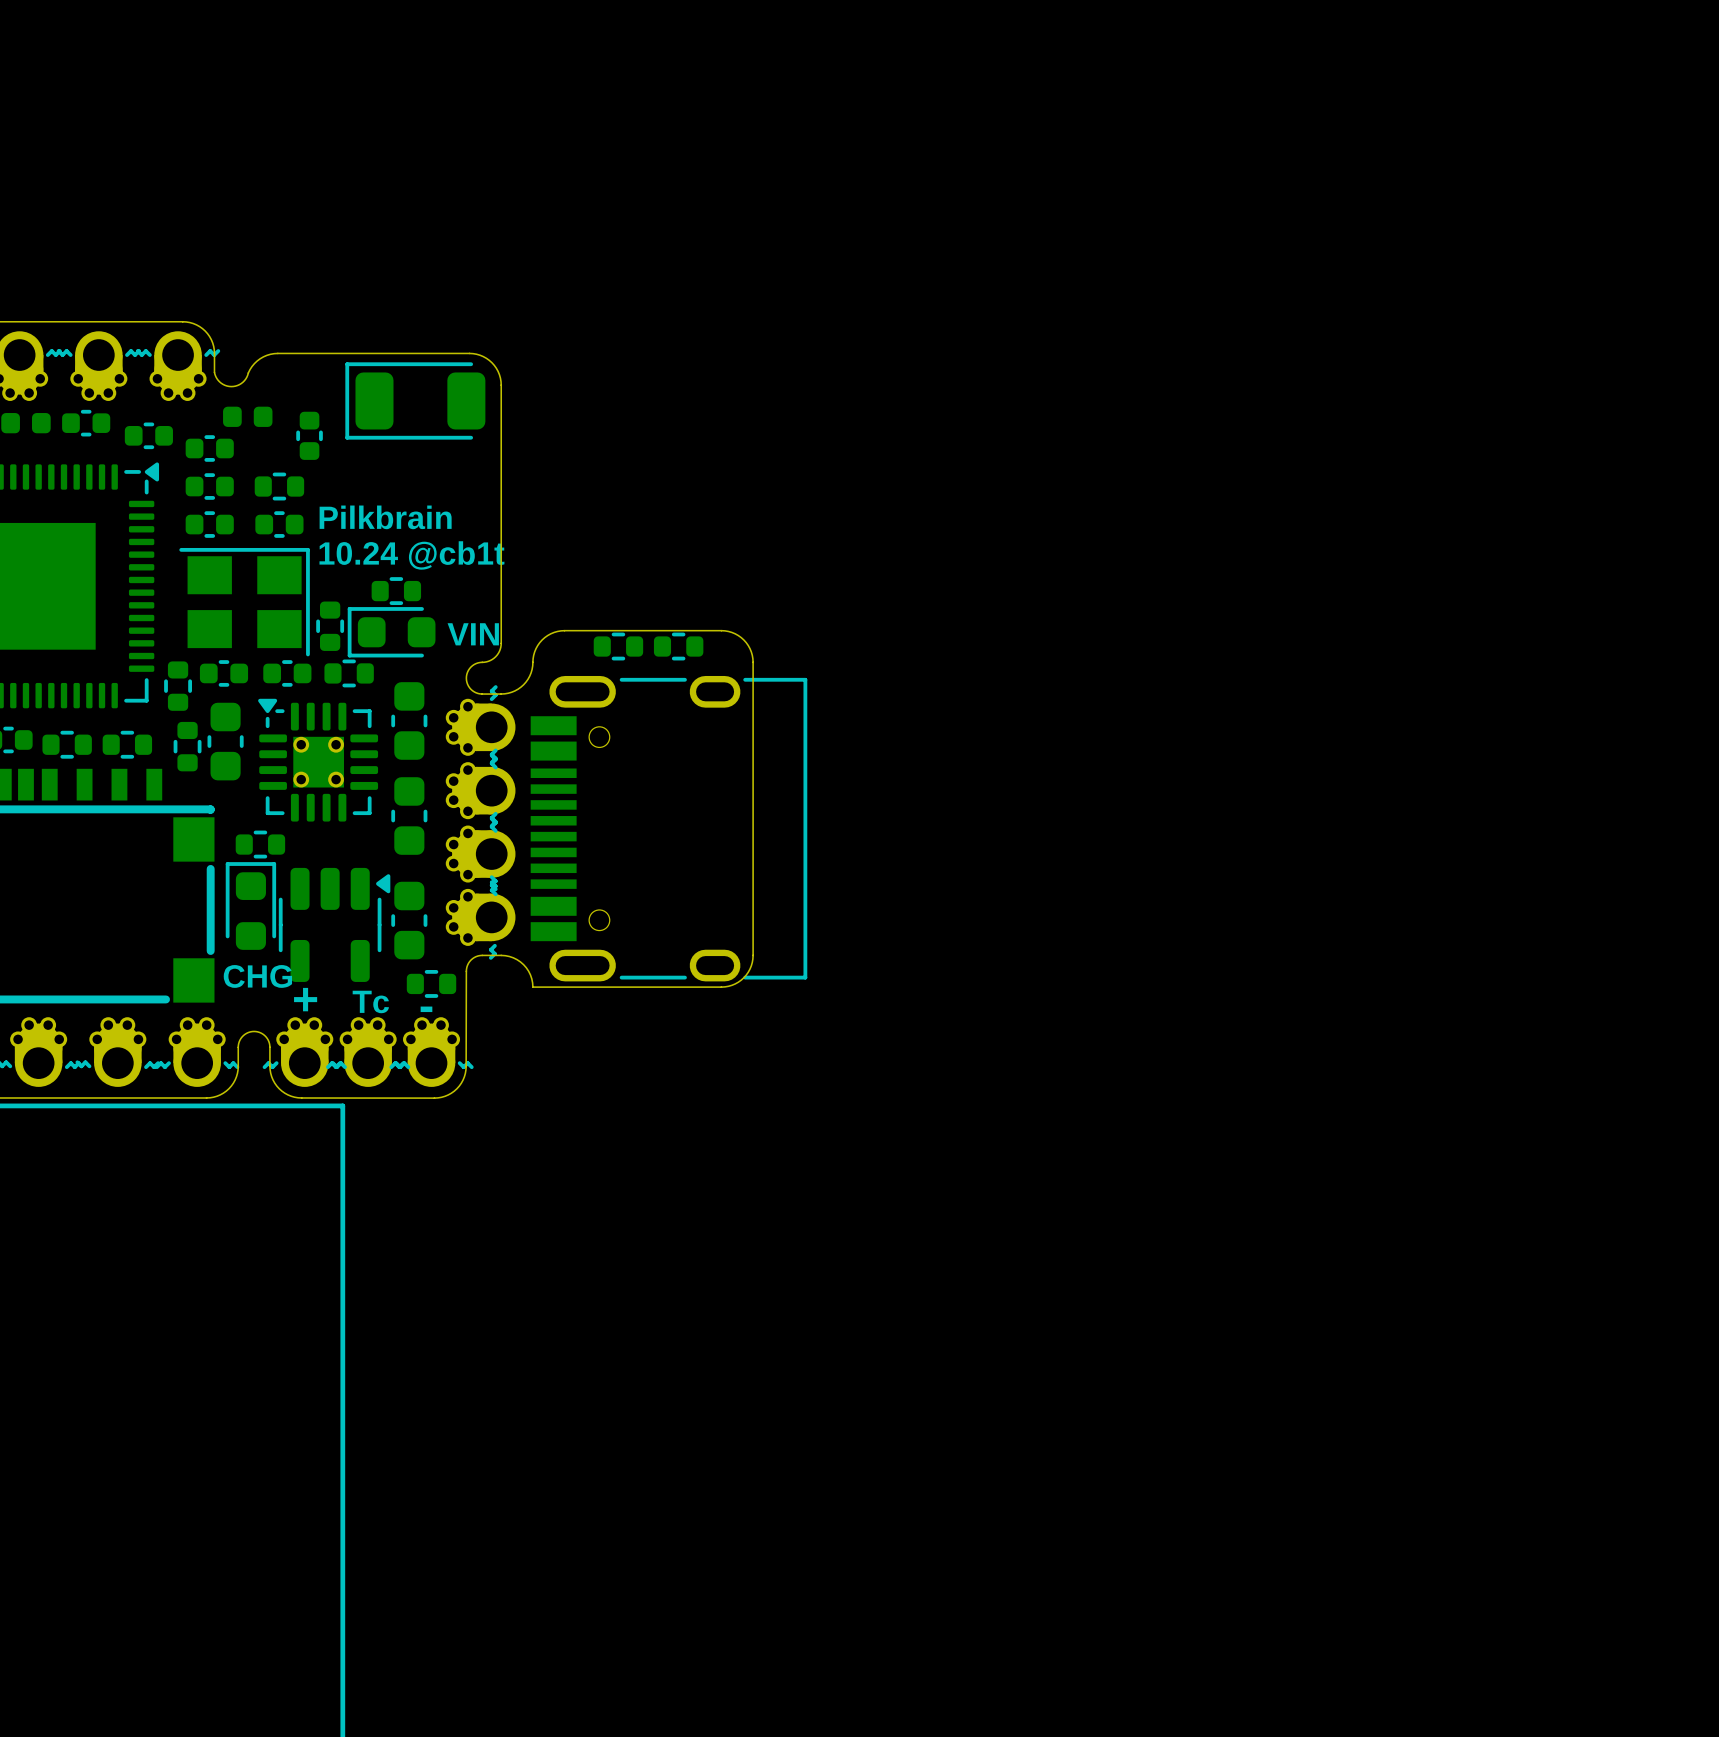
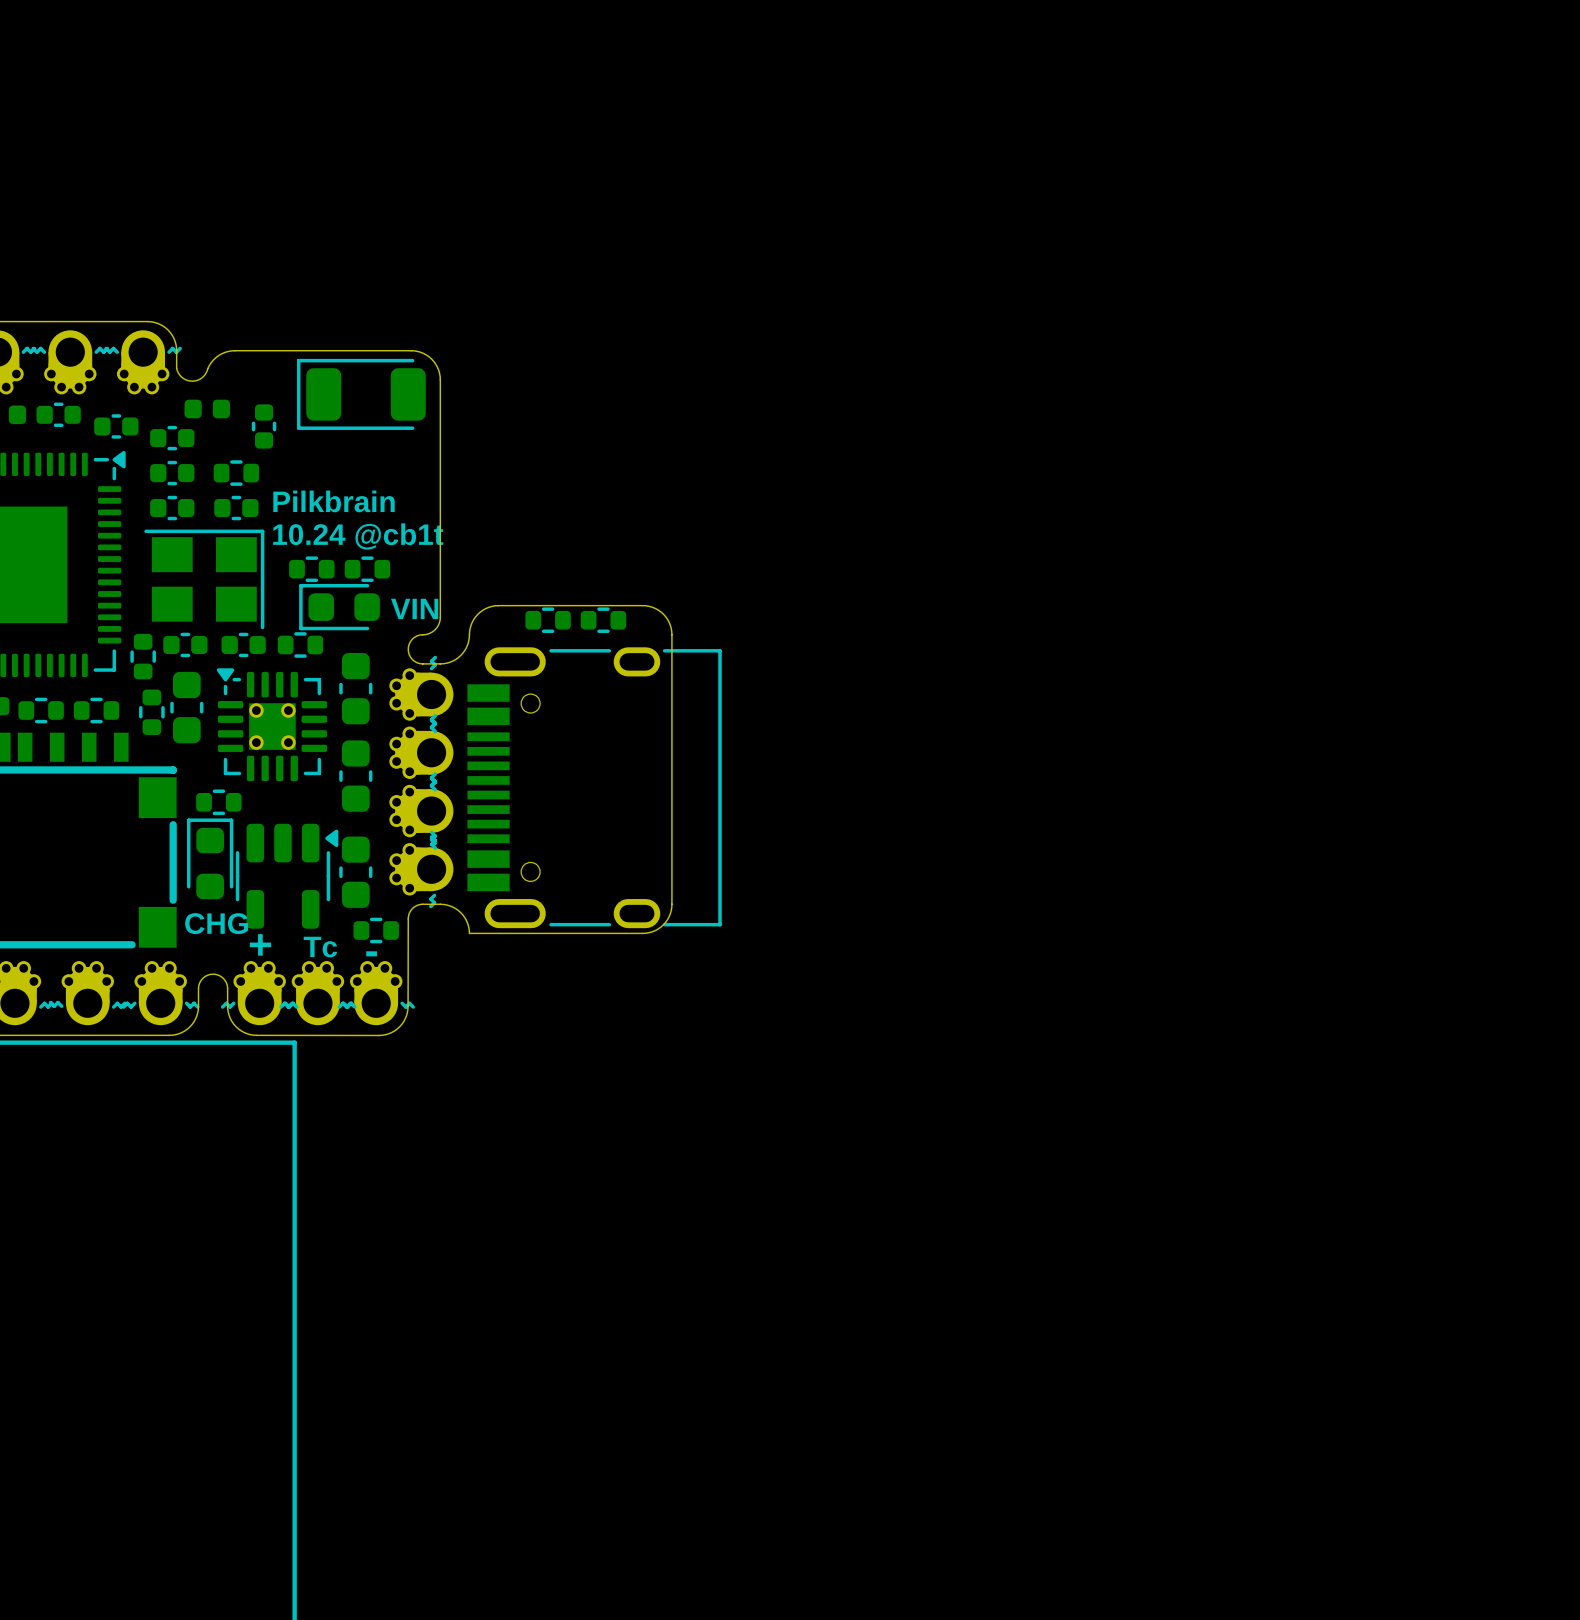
part: none -> (311, 569)
part: (396, 591) -> none
part: none -> (367, 569)
part: (330, 626) -> none

